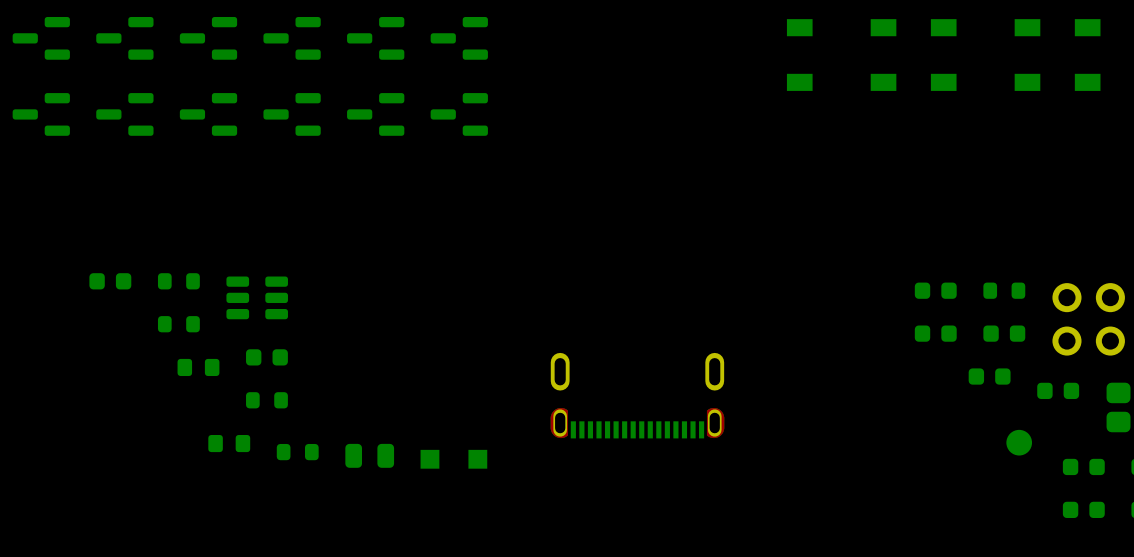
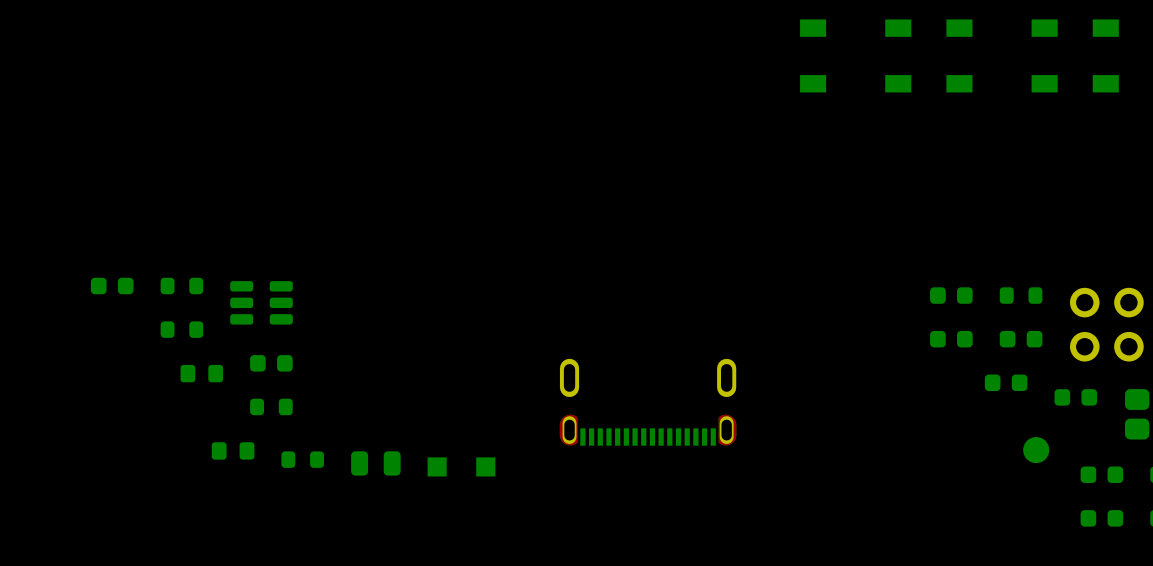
part: (41, 38) -> none
part: (124, 38) -> none
part: (208, 38) -> none
part: (292, 38) -> none
part: (375, 38) -> none
part: (459, 38) -> none
part: (41, 114) -> none
part: (124, 114) -> none
part: (208, 114) -> none
part: (292, 114) -> none
part: (375, 114) -> none
part: (459, 114) -> none

